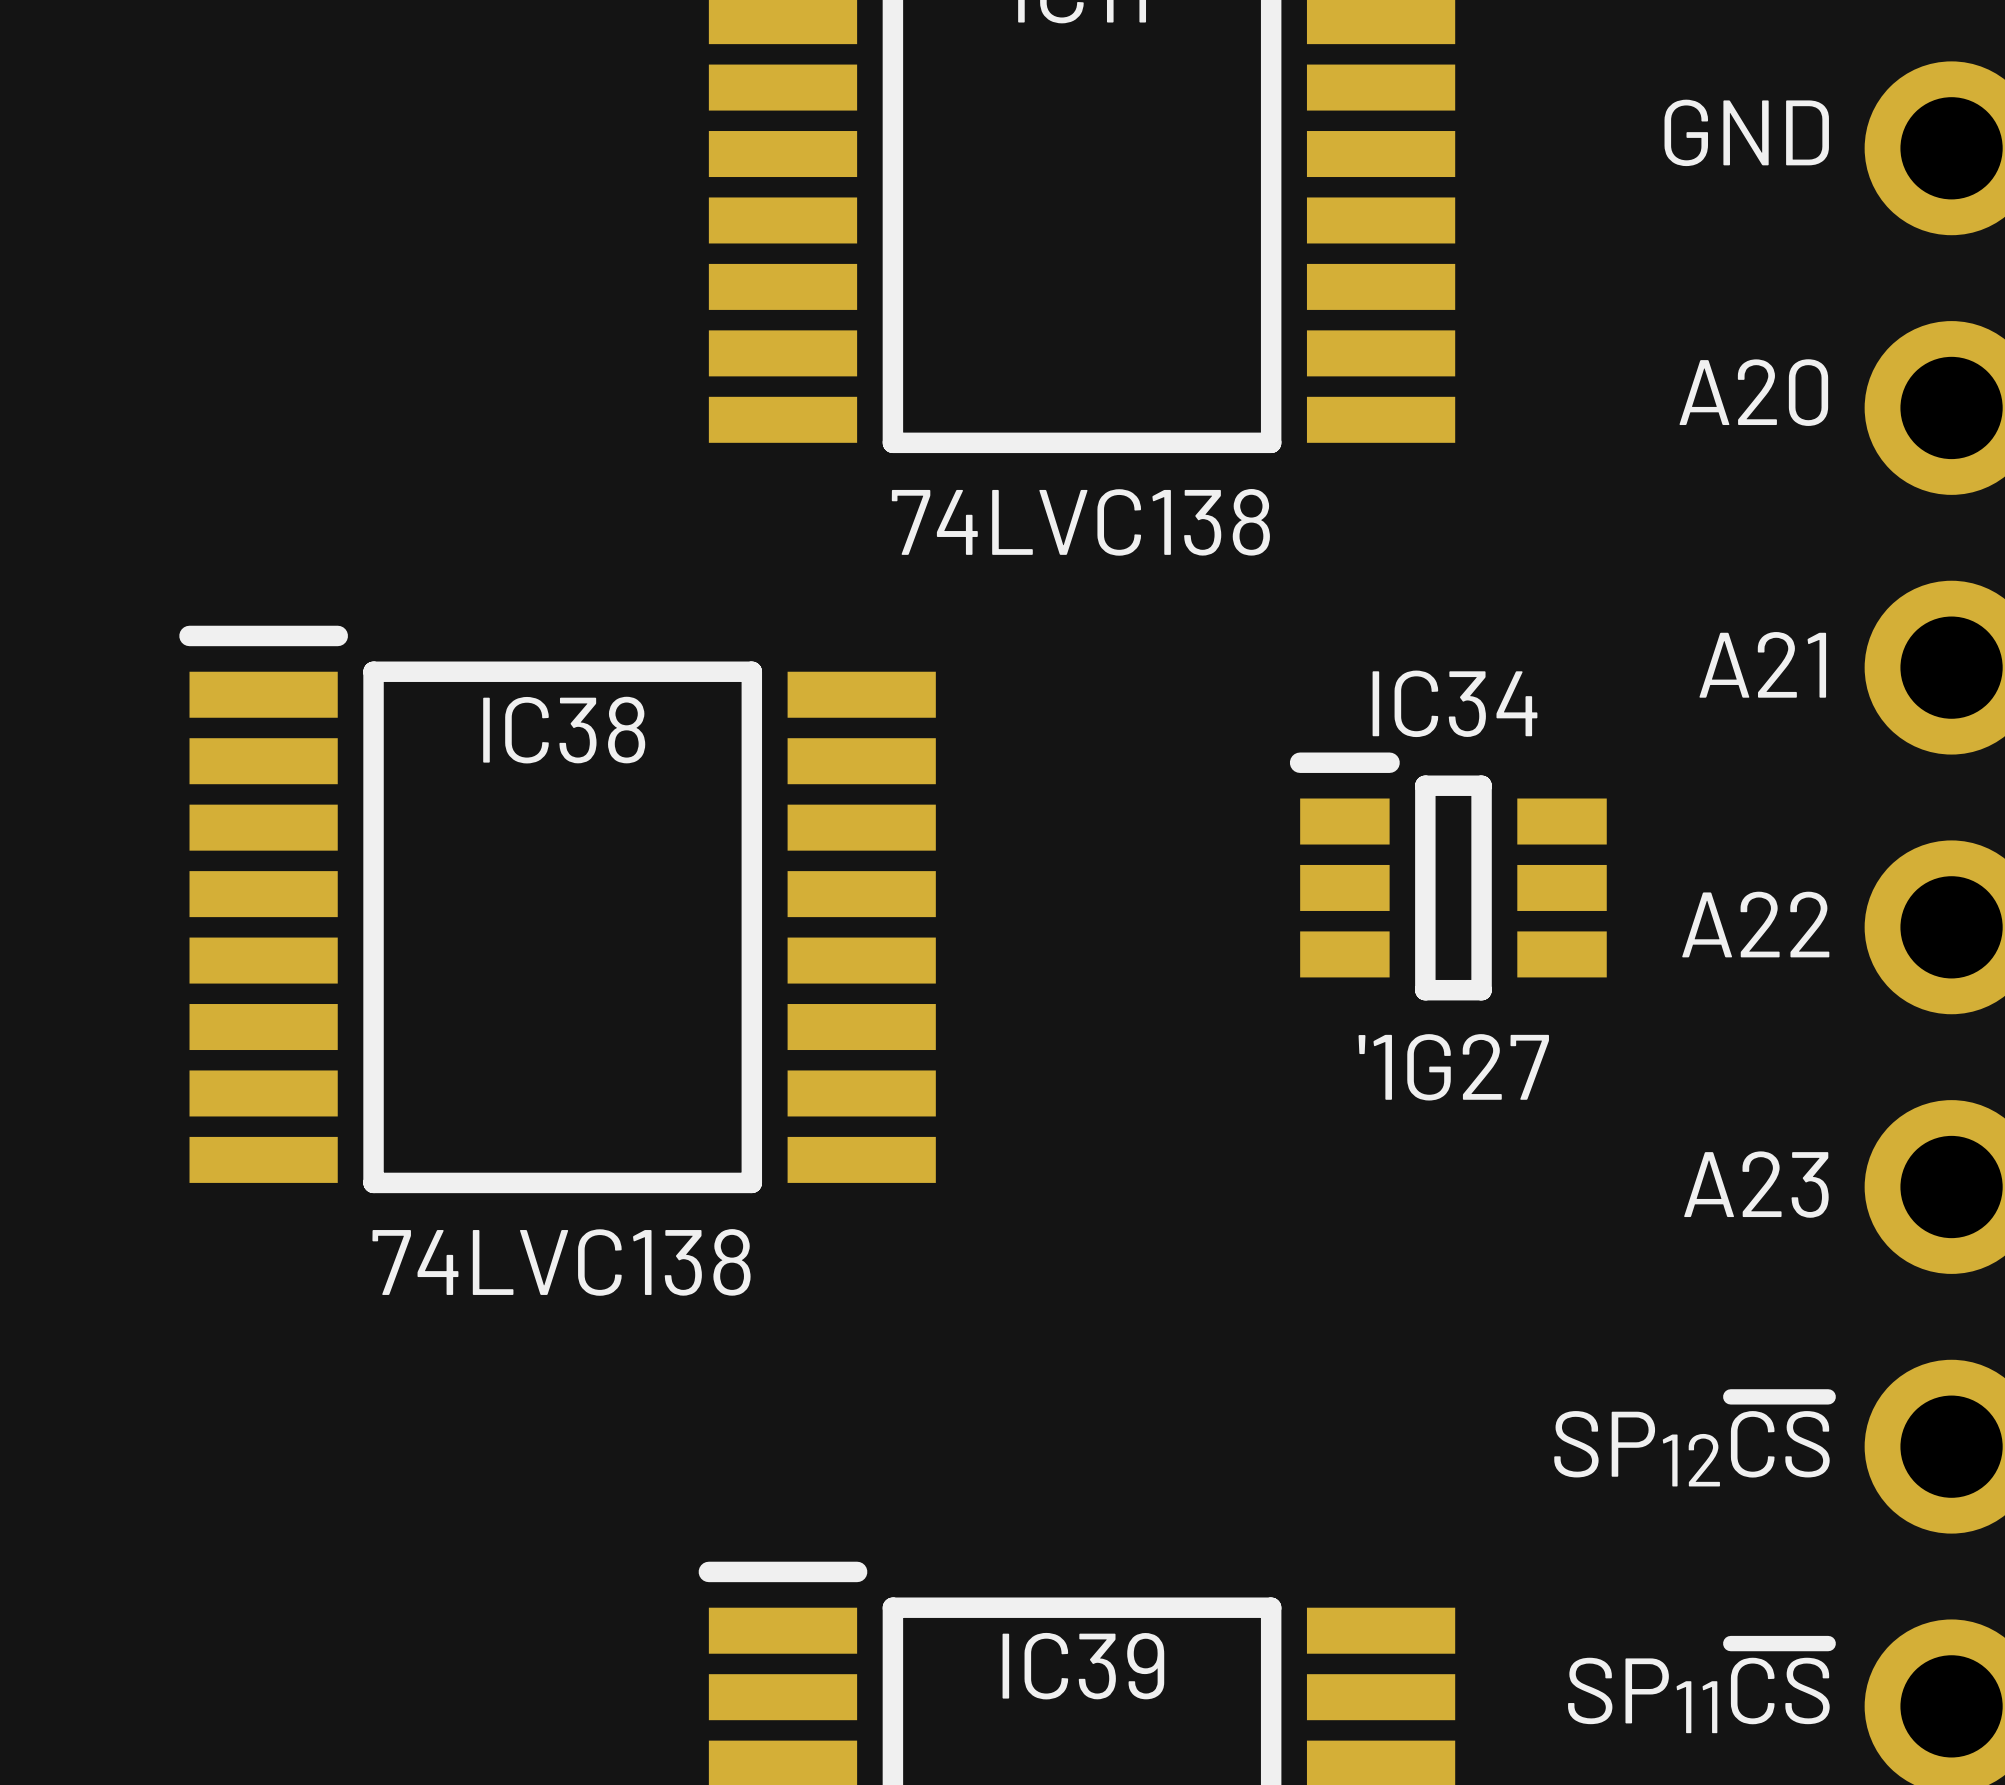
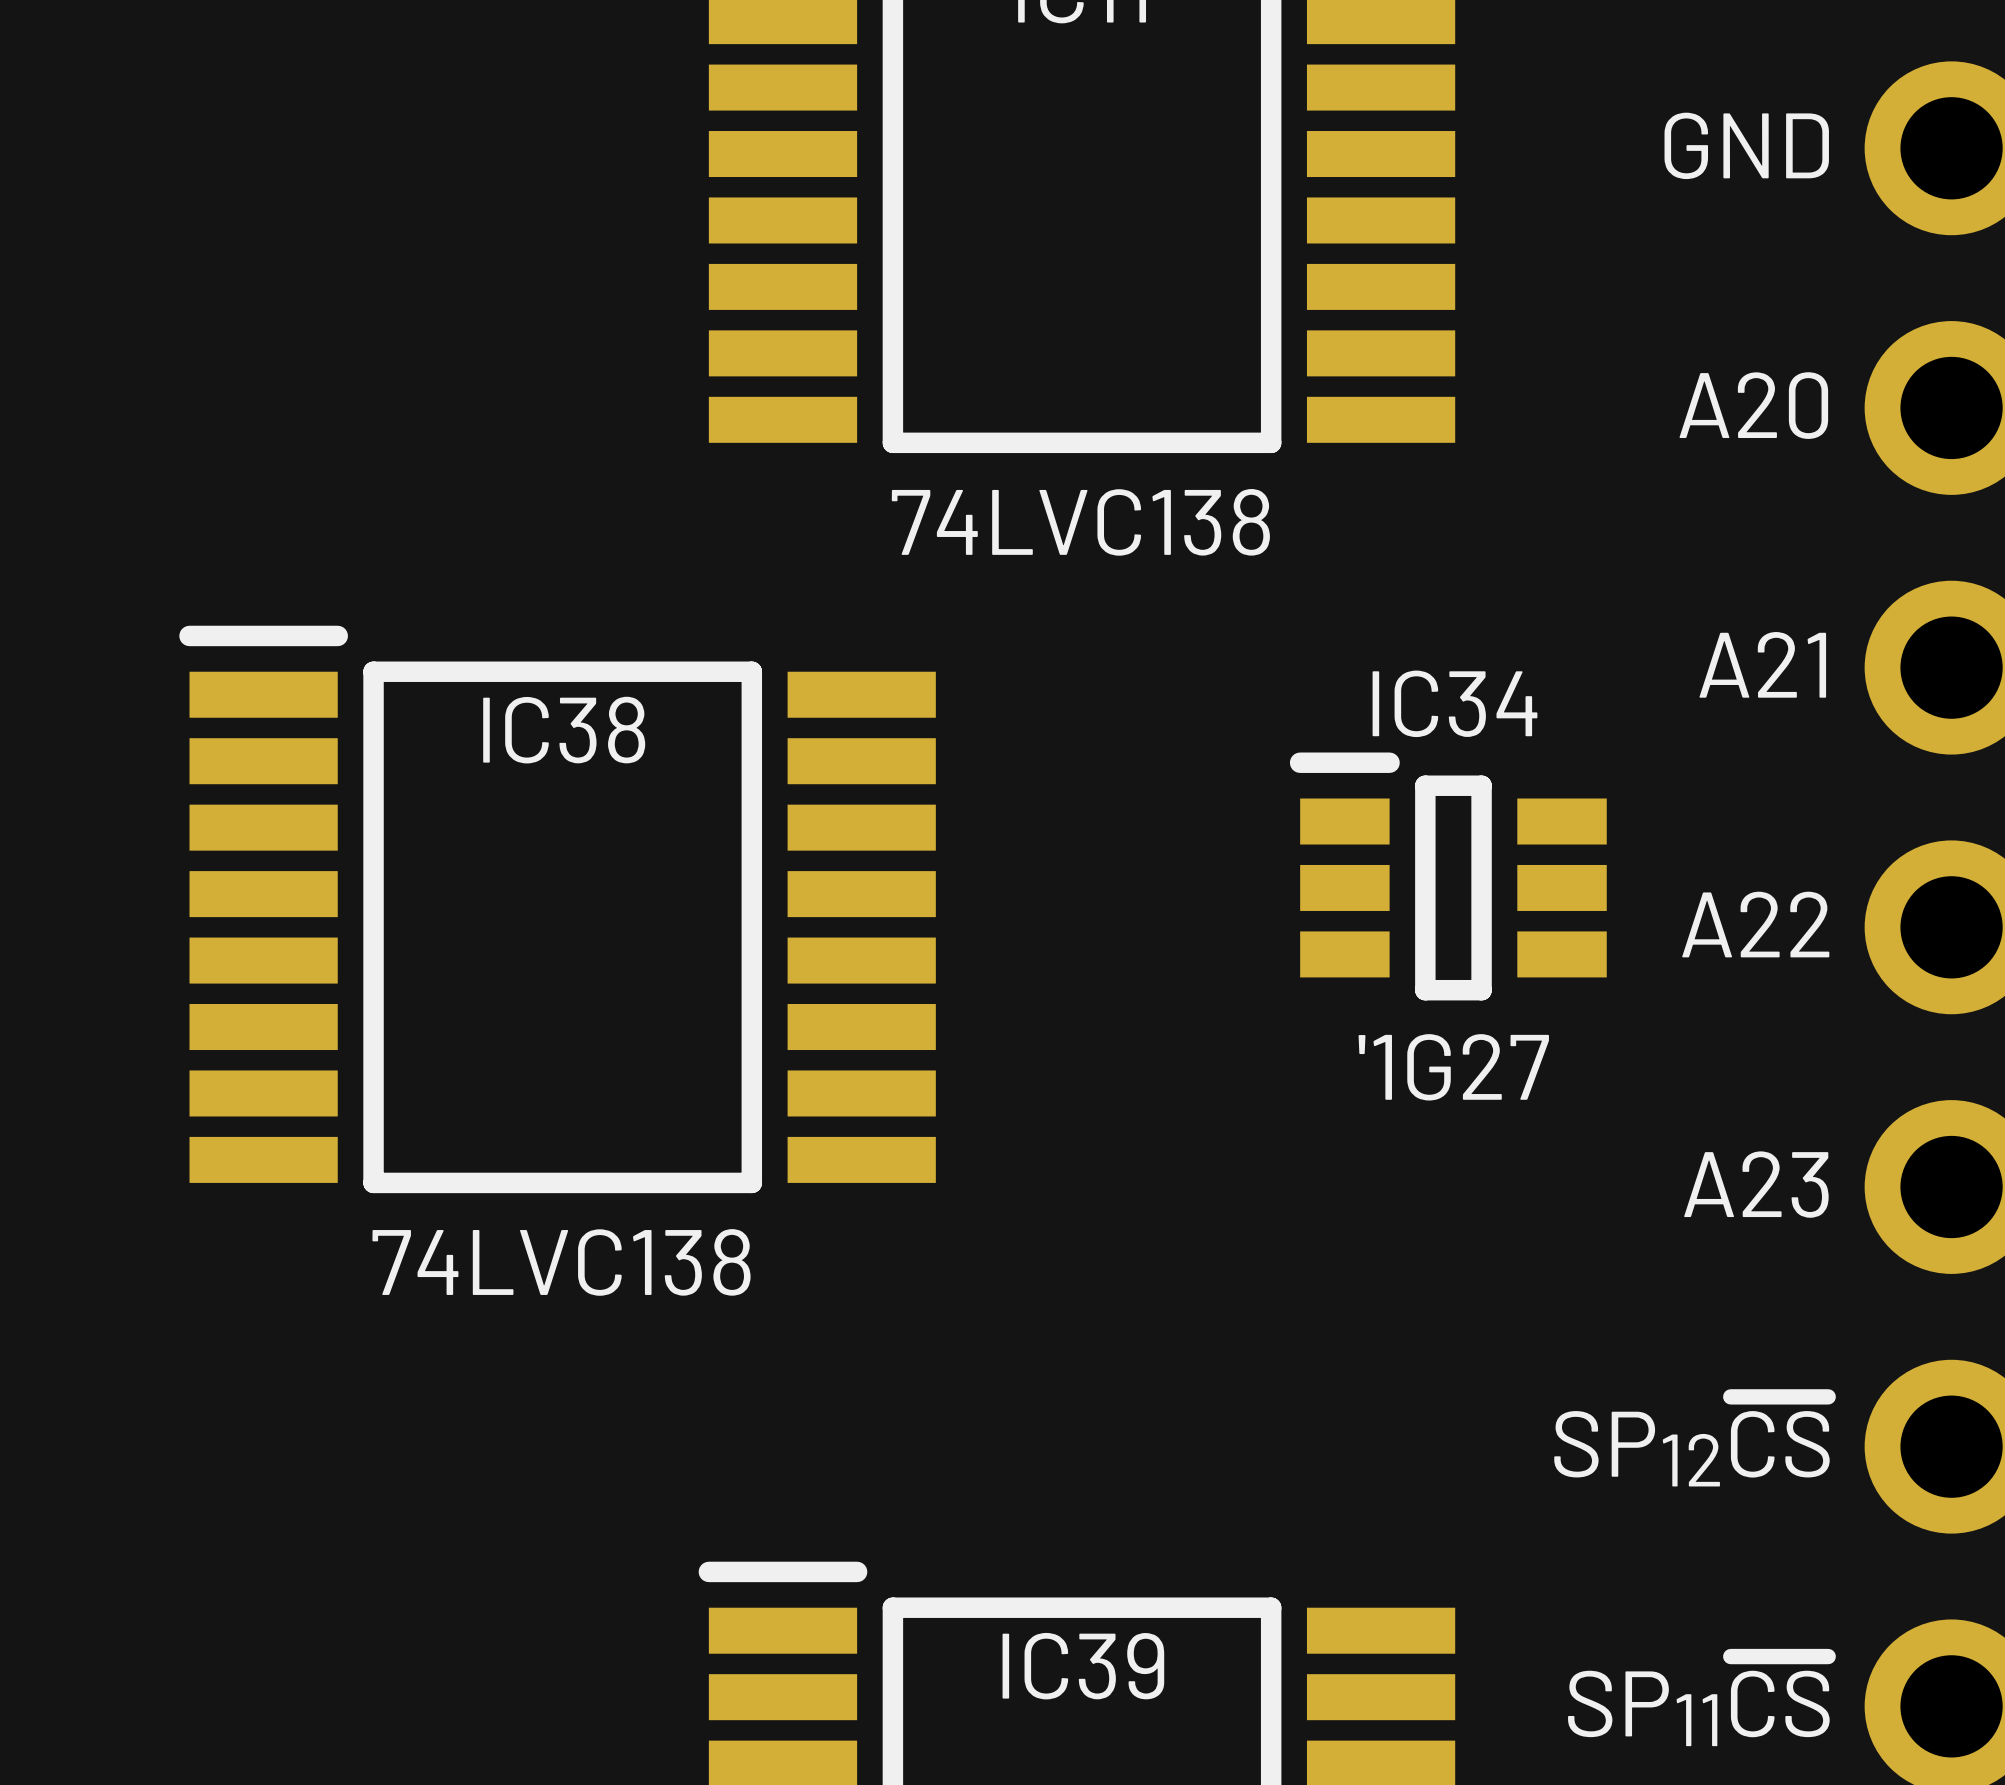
text position: GND (1746, 132) -> GND (1746, 145)
text position: A20 (1753, 392) -> A20 (1753, 405)
text position: SP11~{CS} (1698, 1688) -> SP11~{CS} (1698, 1701)

